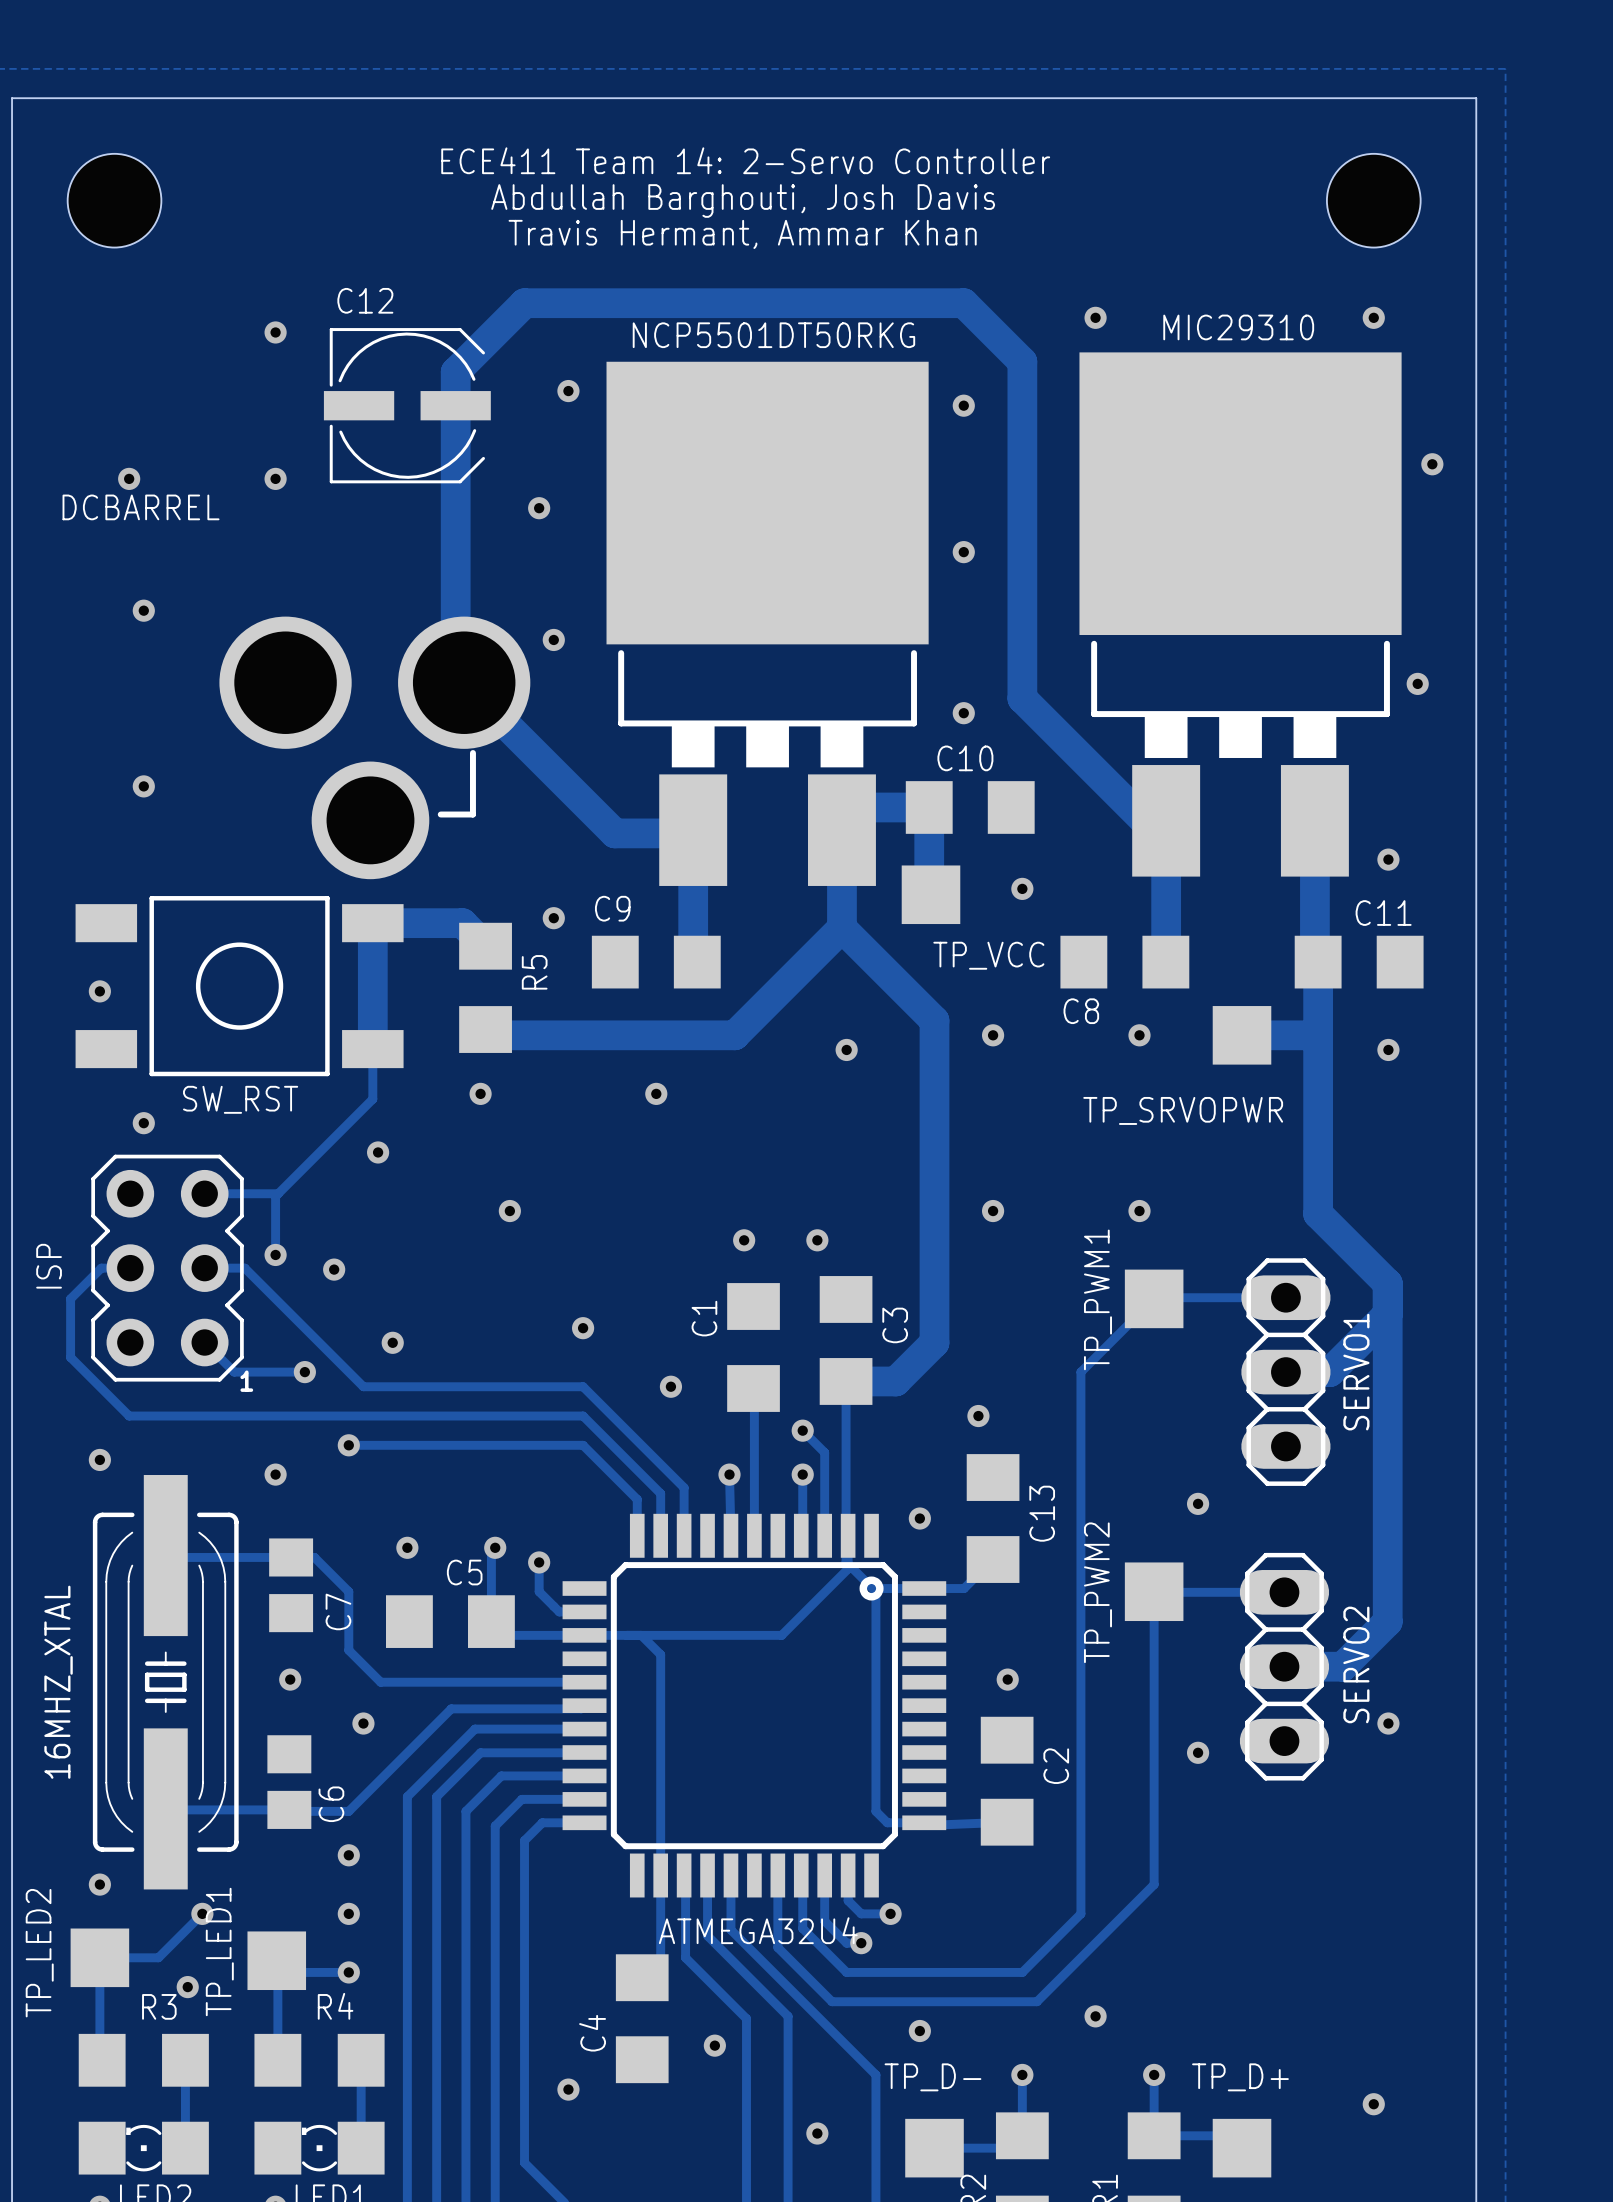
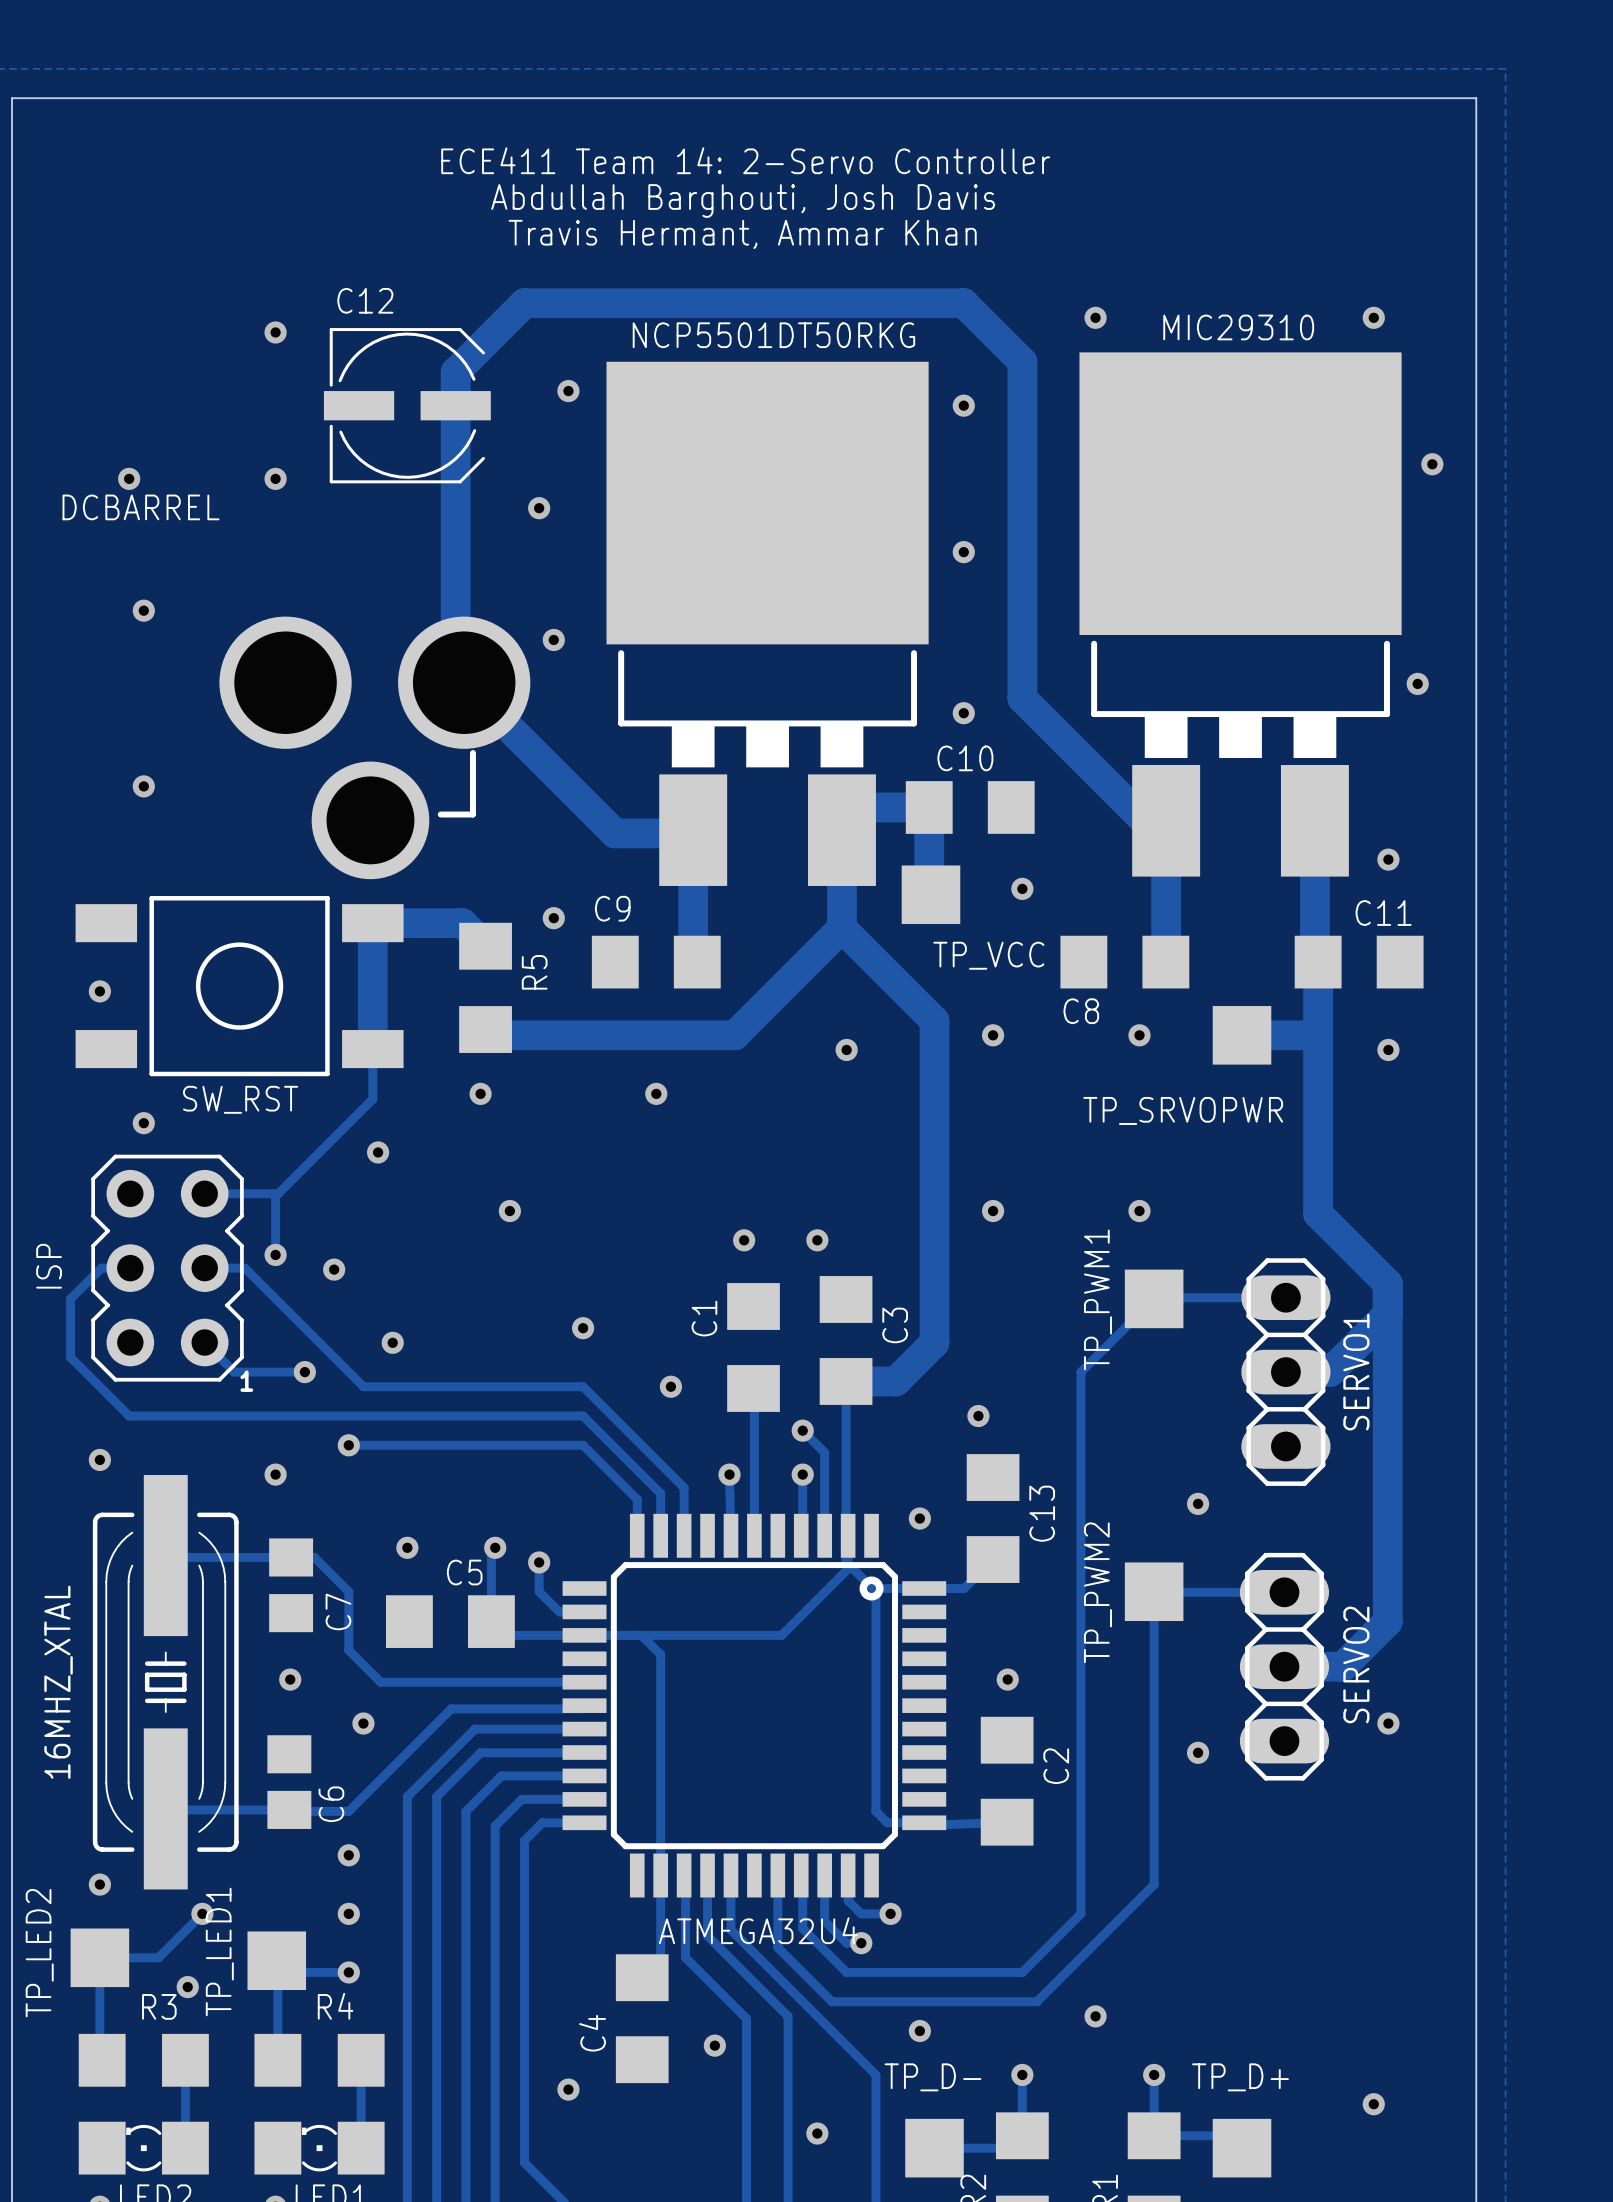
hole: (114, 200) -> none
hole: (1373, 200) -> none

